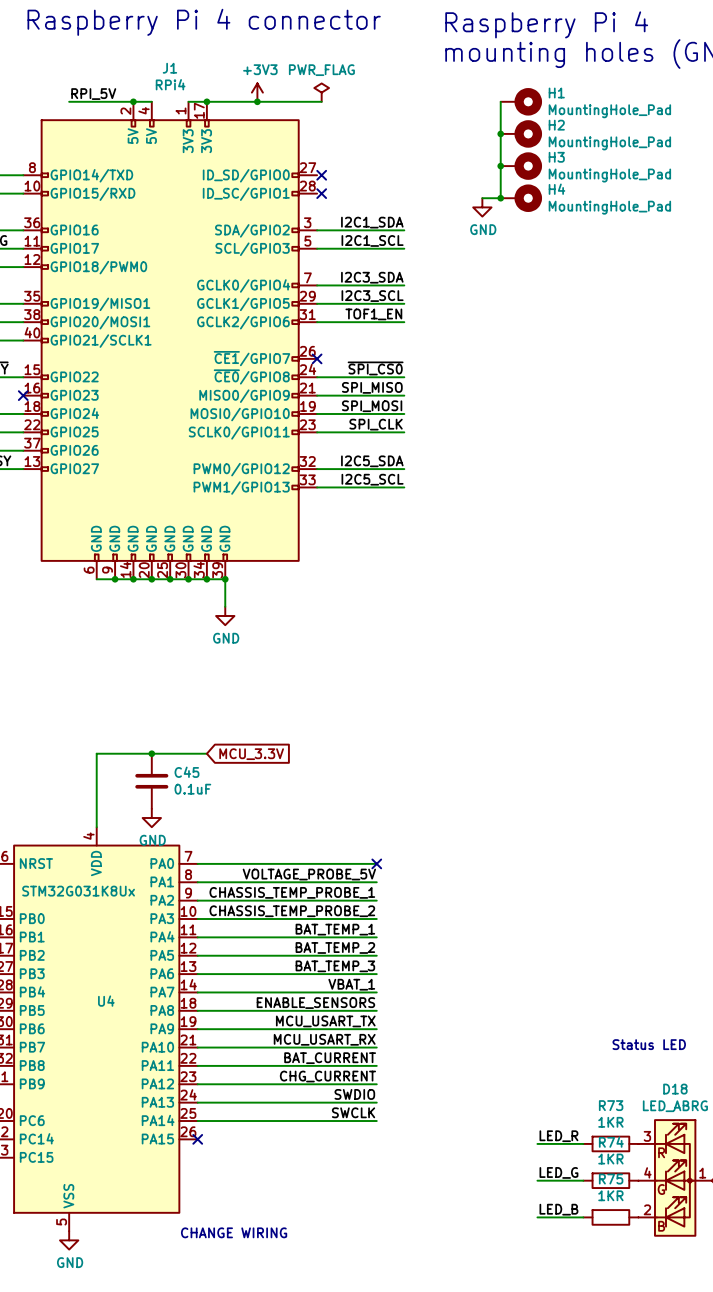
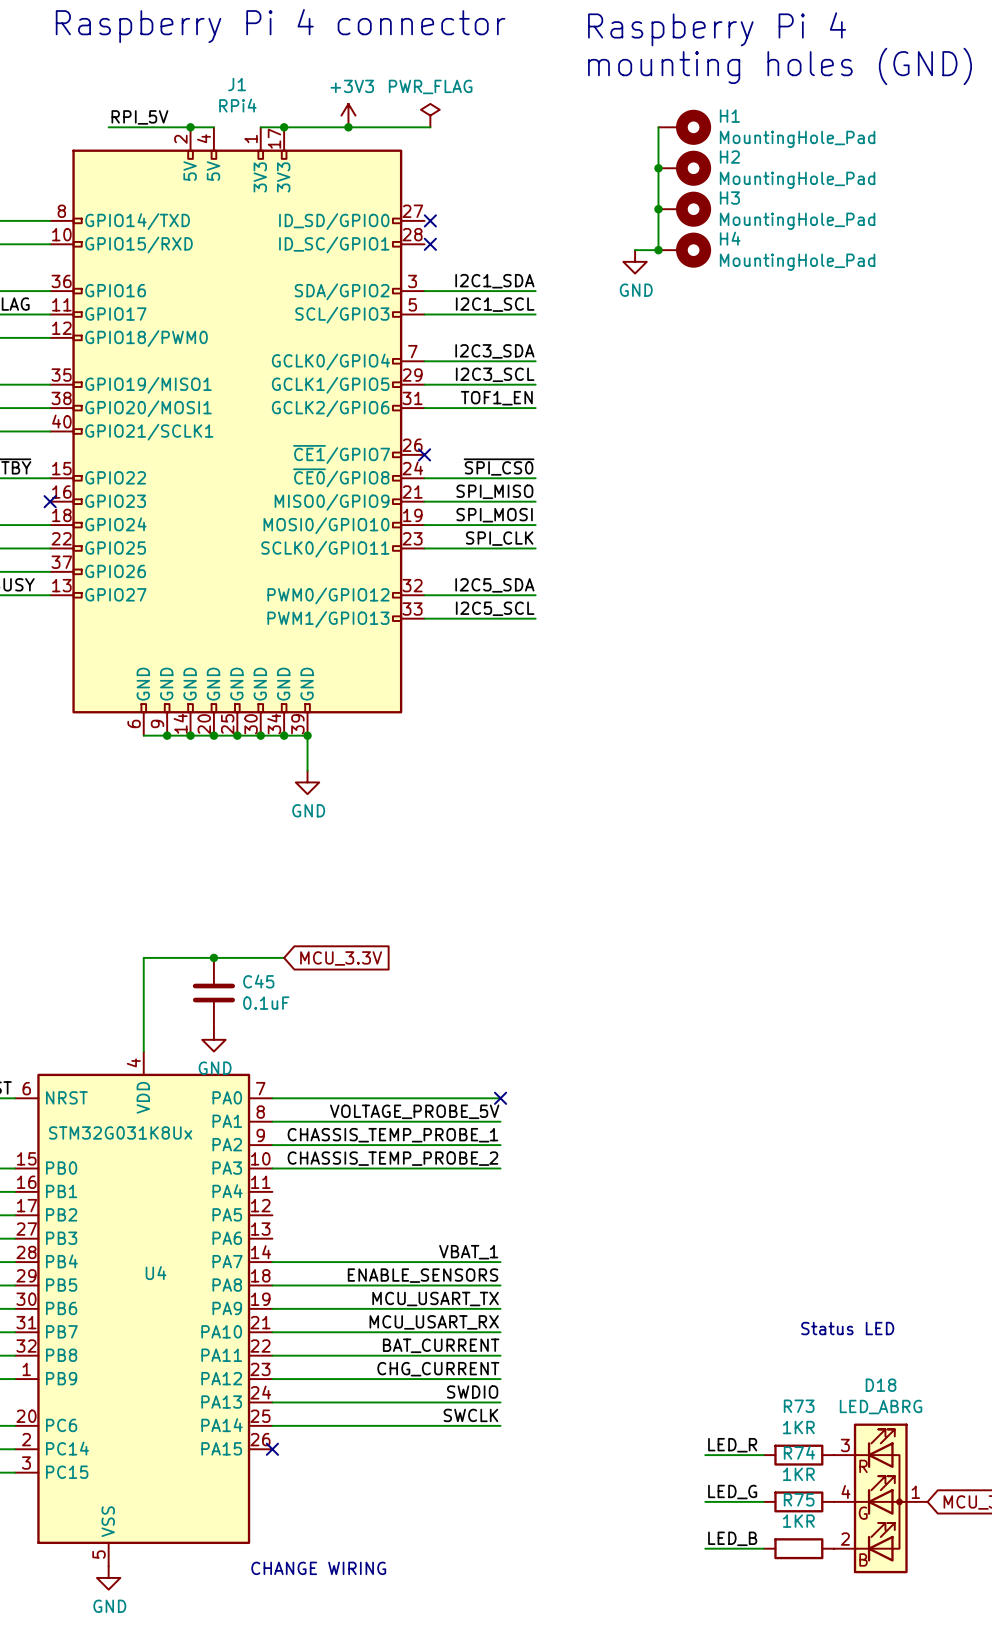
label: BAT_TEMP_1 (335, 929) -> none
wire: (197, 937) (376, 937) -> none
label: BAT_TEMP_2 (335, 947) -> none
wire: (197, 955) (376, 955) -> none
label: BAT_TEMP_3 (335, 966) -> none
wire: (197, 974) (376, 974) -> none

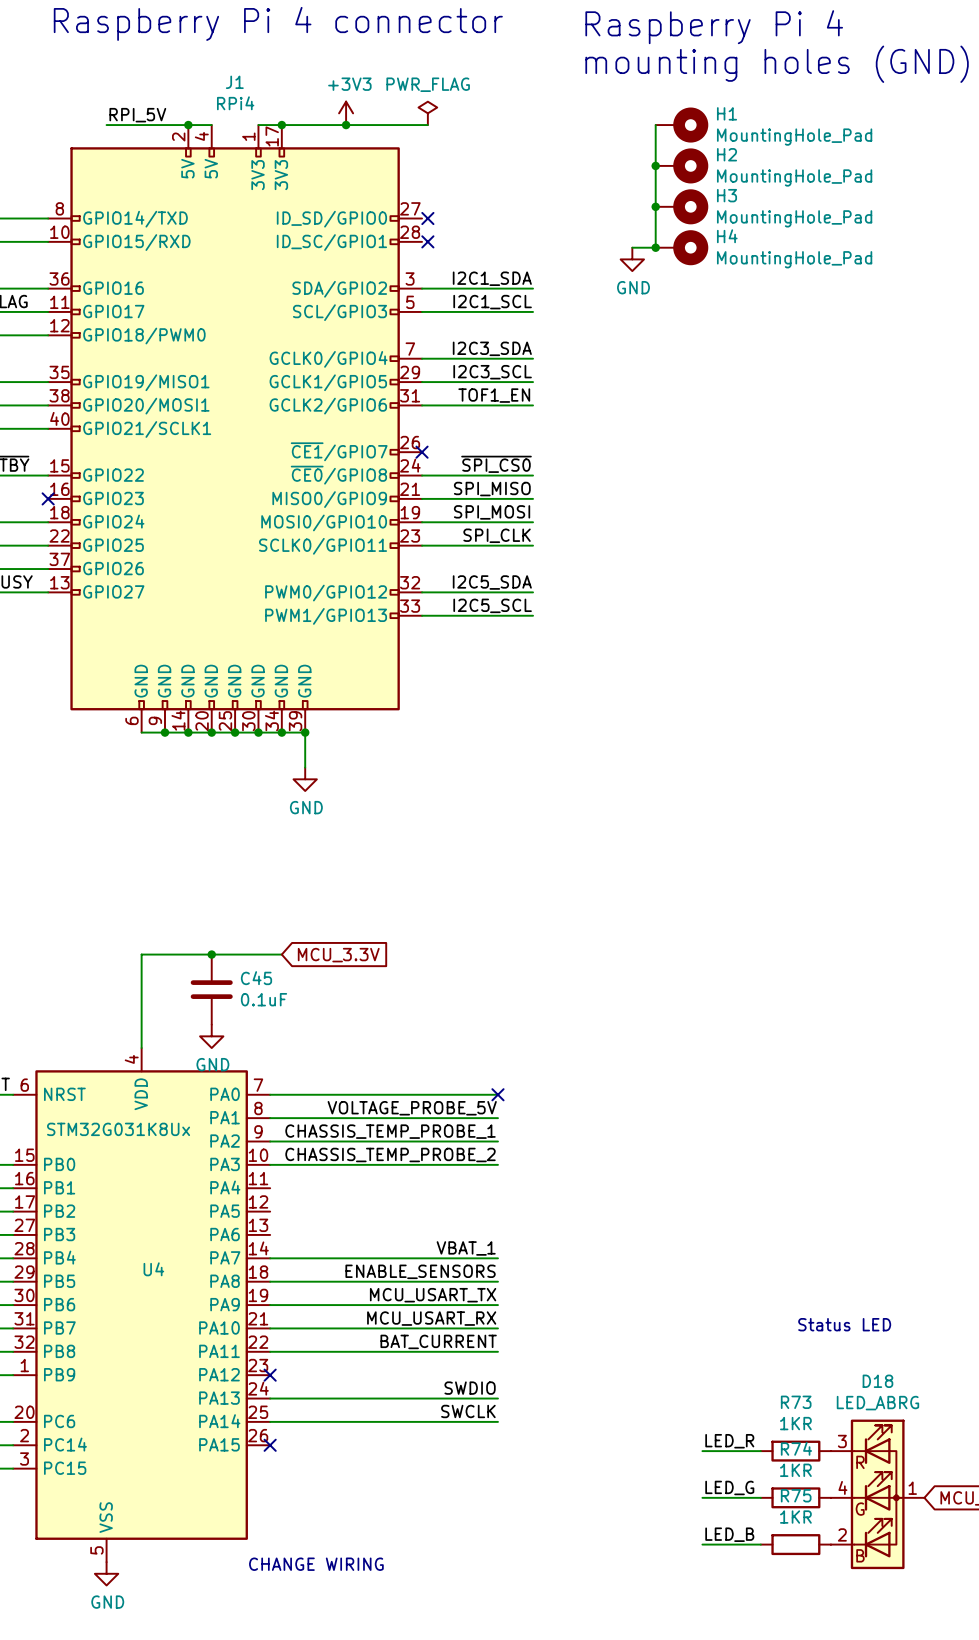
label: CHG_CURRENT (438, 1369) -> none
wire: (272, 1379) (500, 1379) -> none
no-connect mark: none -> (270, 1375)

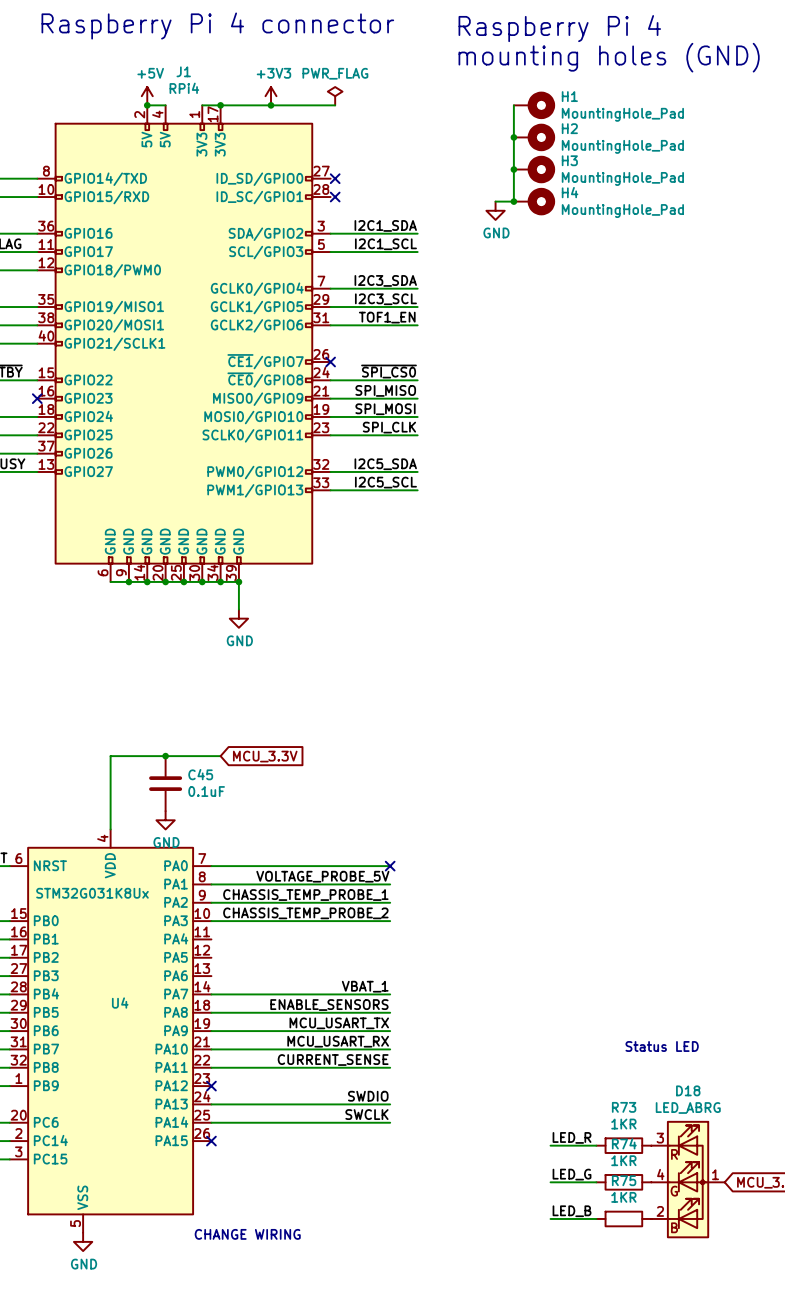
power symbol: none -> +5V (147, 96)
label: RPI_5V (137, 115) -> none
wire: (106, 125) (188, 125) -> none
label: BAT_CURRENT (438, 1341) -> CURRENT_SENSE (333, 1060)

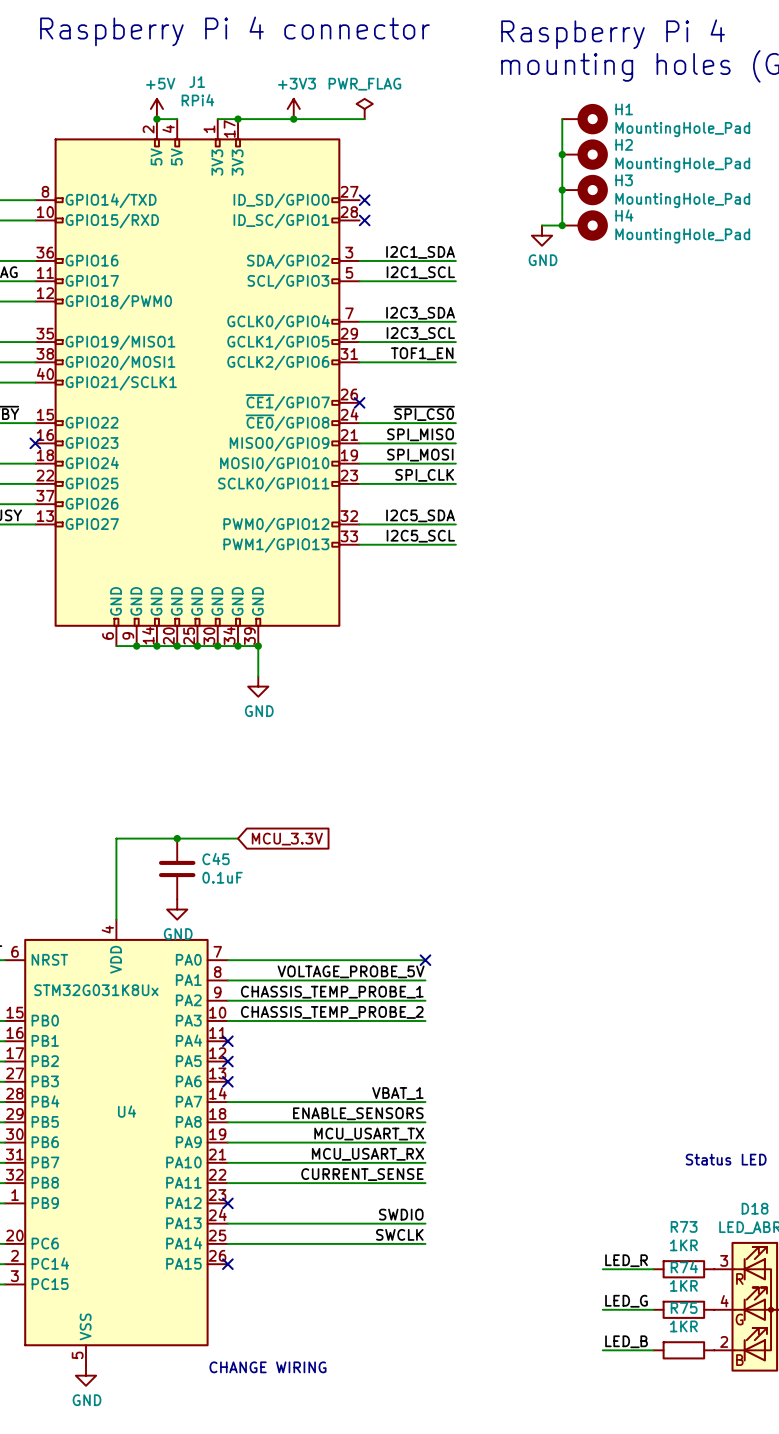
no-connect mark: none -> (227, 1041)
no-connect mark: none -> (227, 1061)
no-connect mark: none -> (227, 1081)

